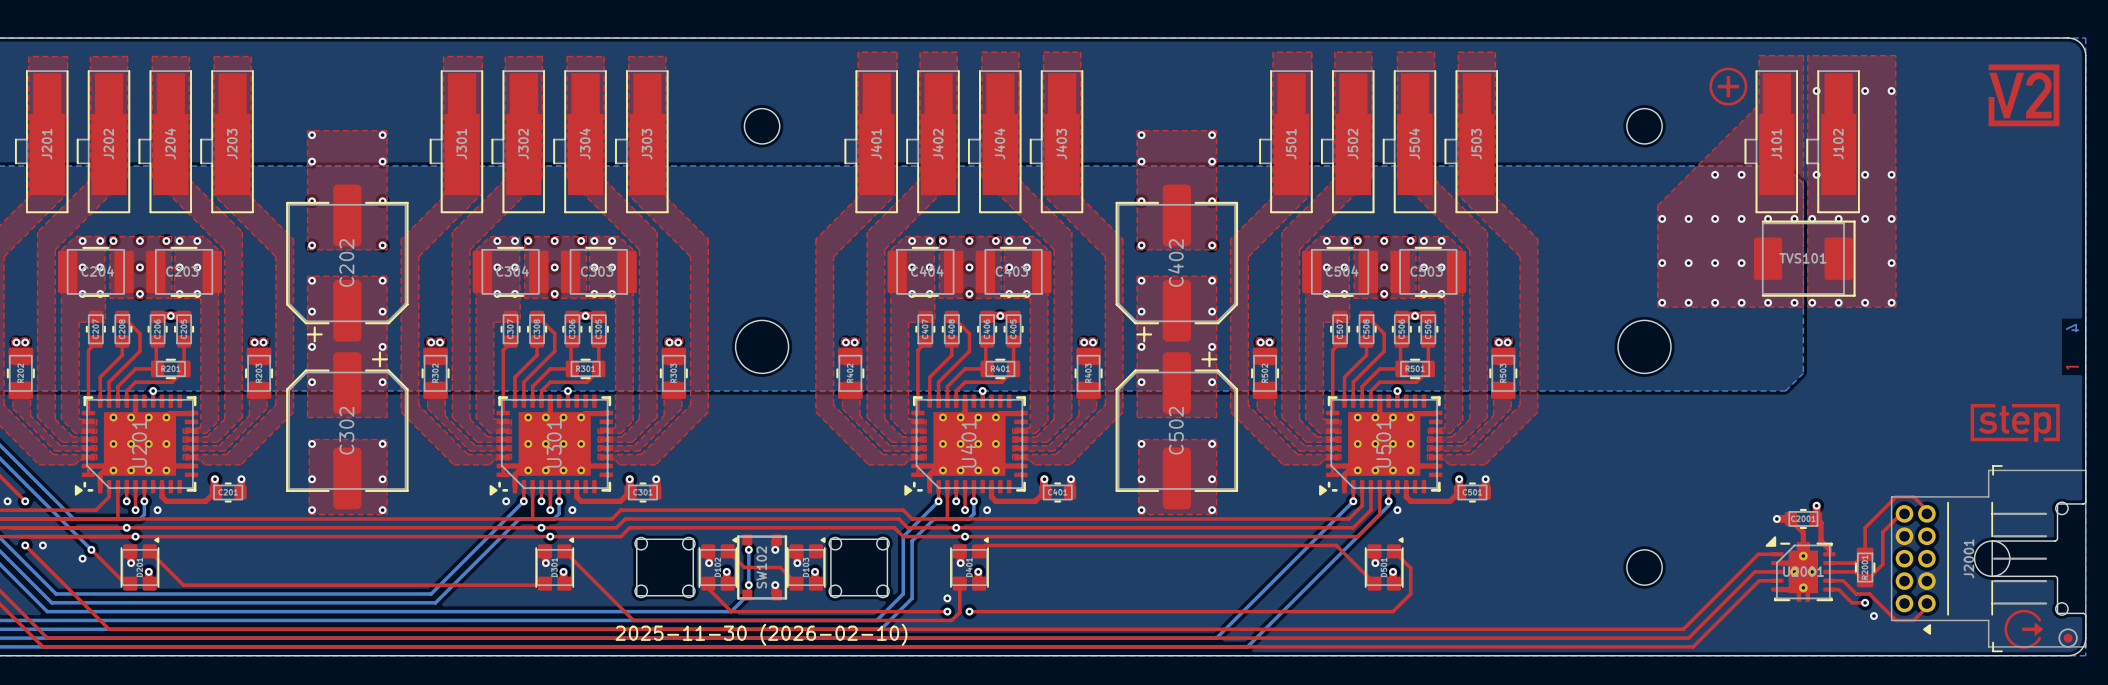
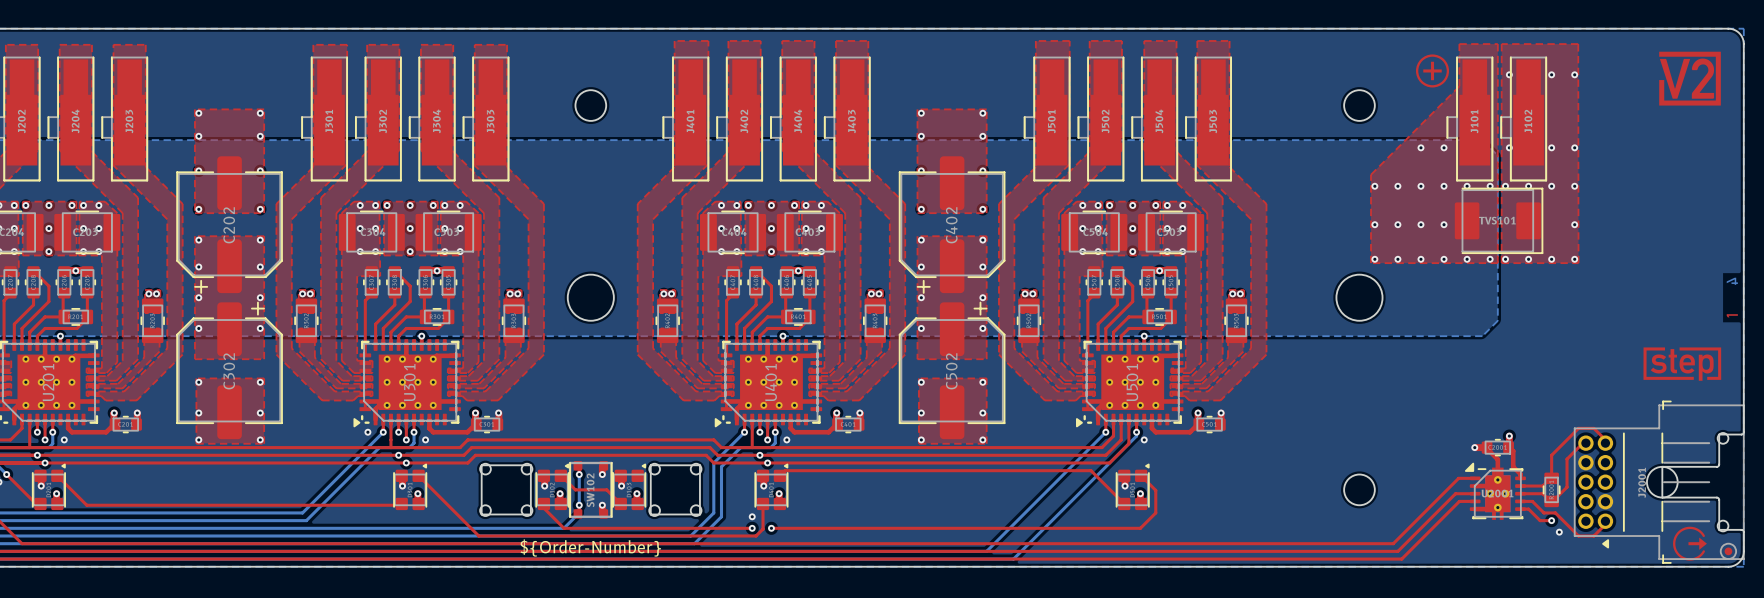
drawing shape: [615, 623, 908, 646] -> [520, 539, 661, 557]

